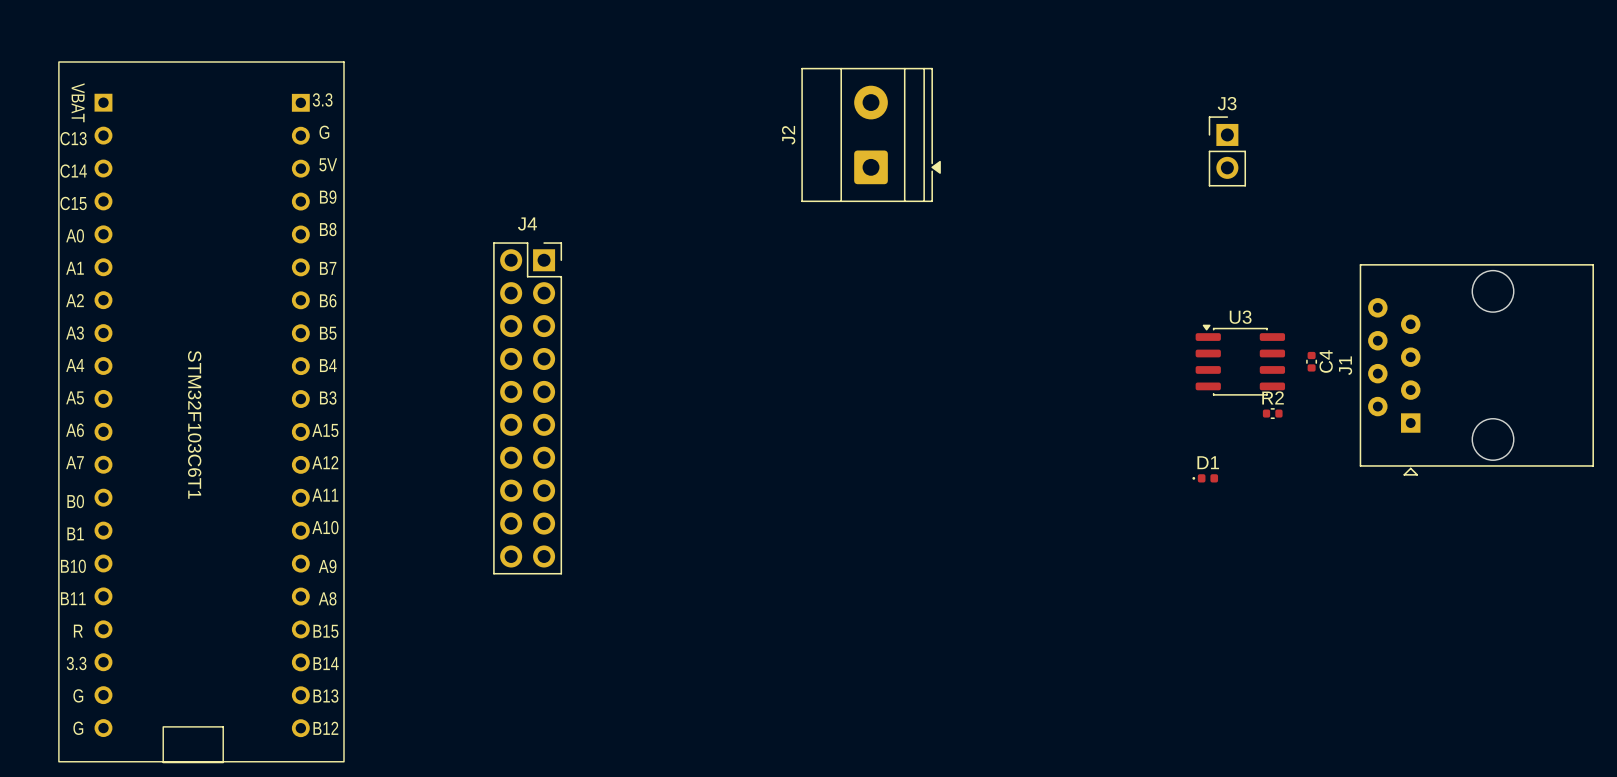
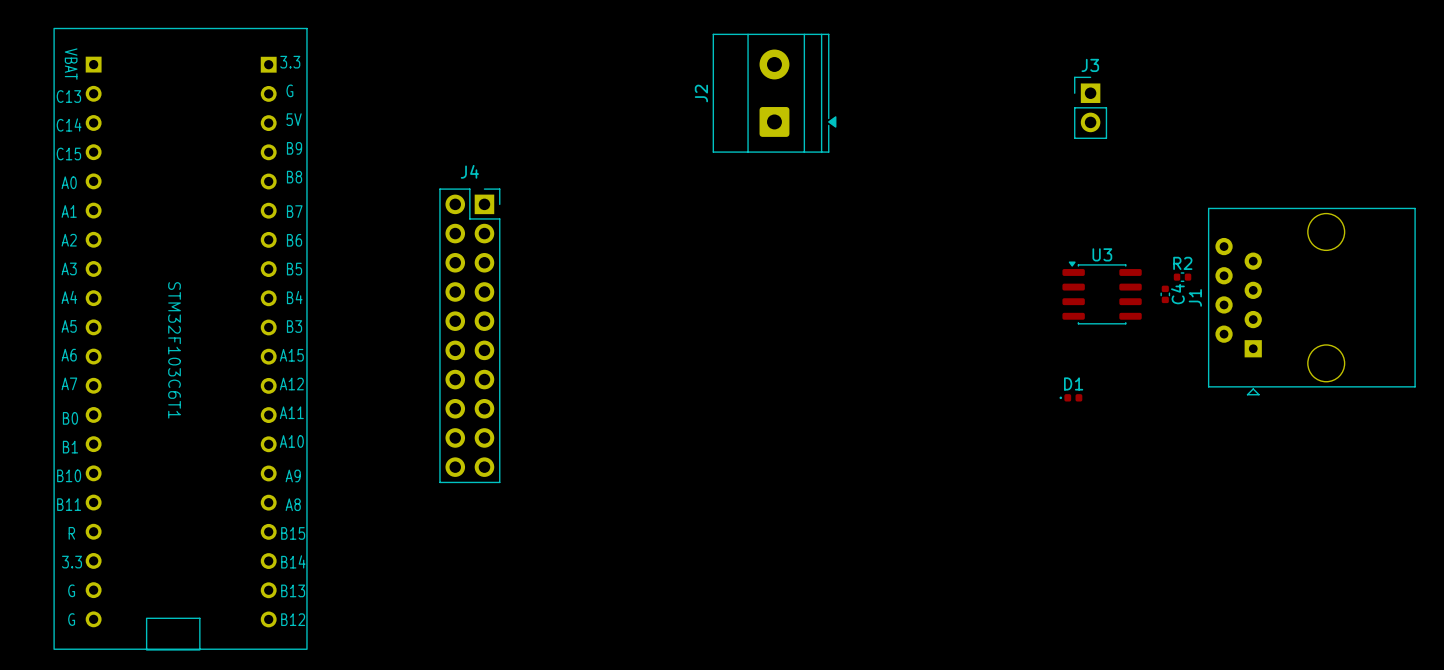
R2 position: (1272, 413) -> (1182, 277)

